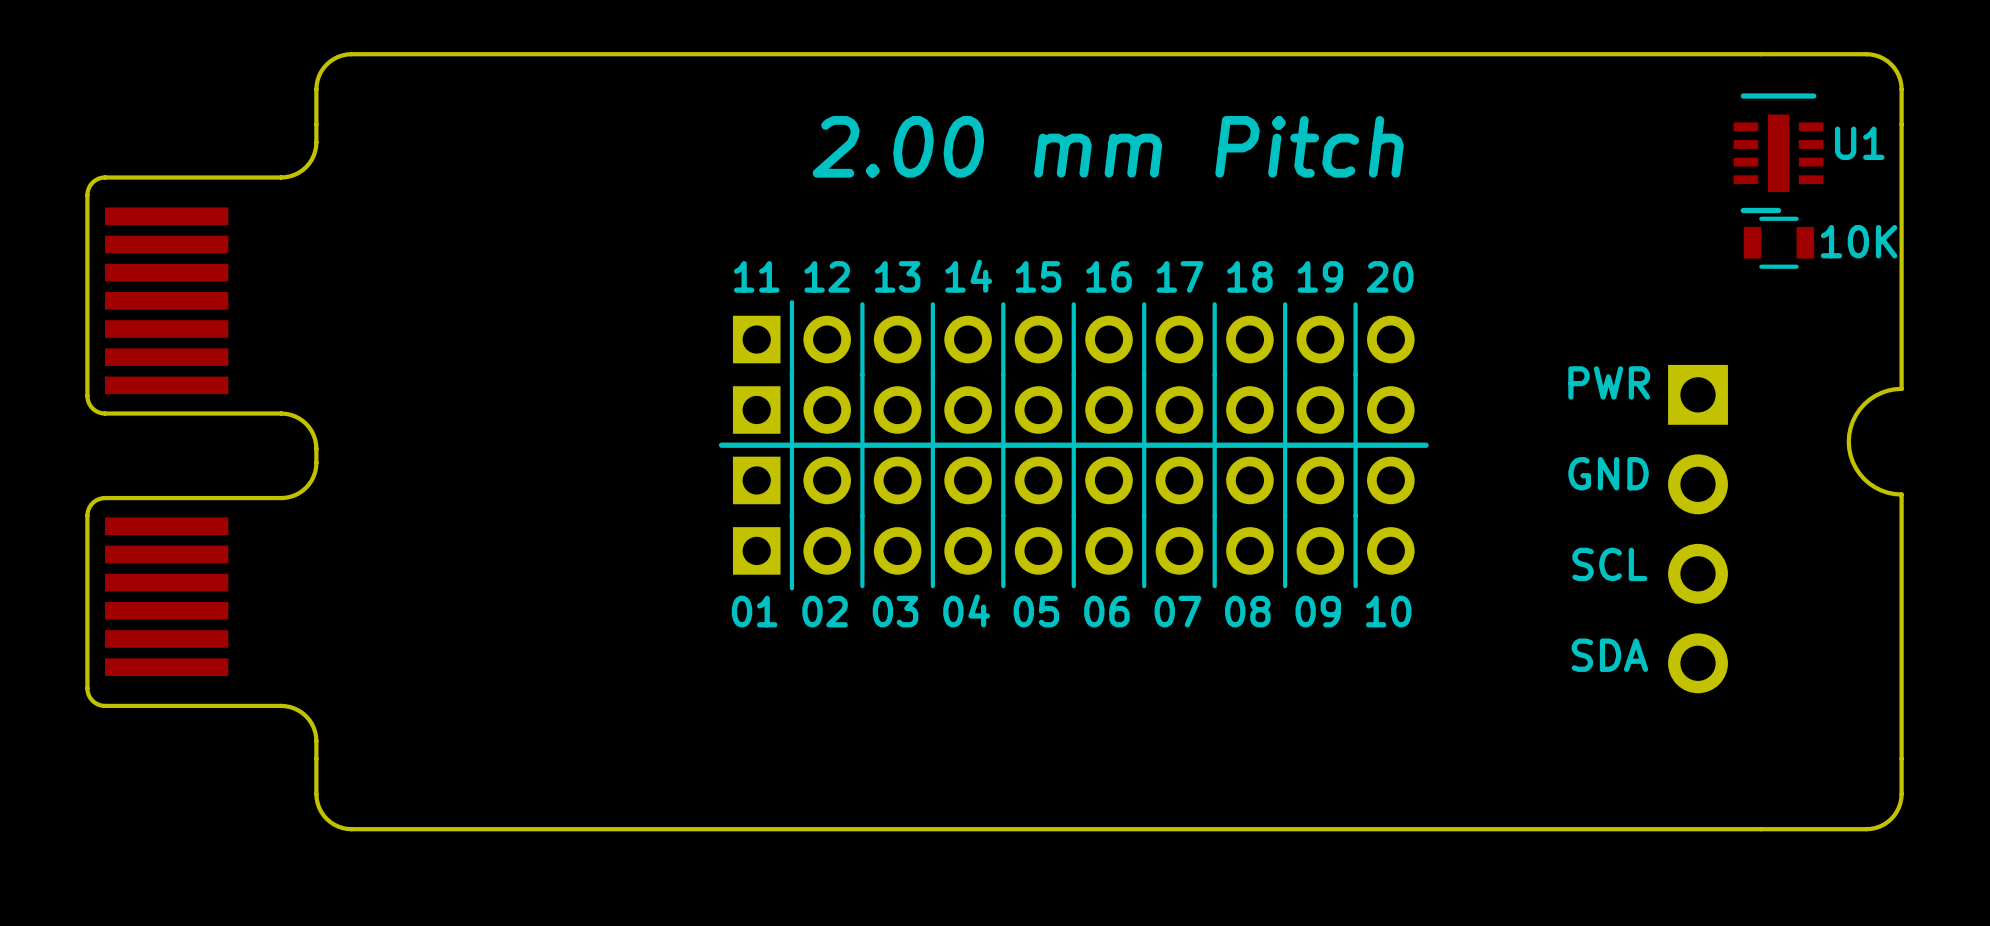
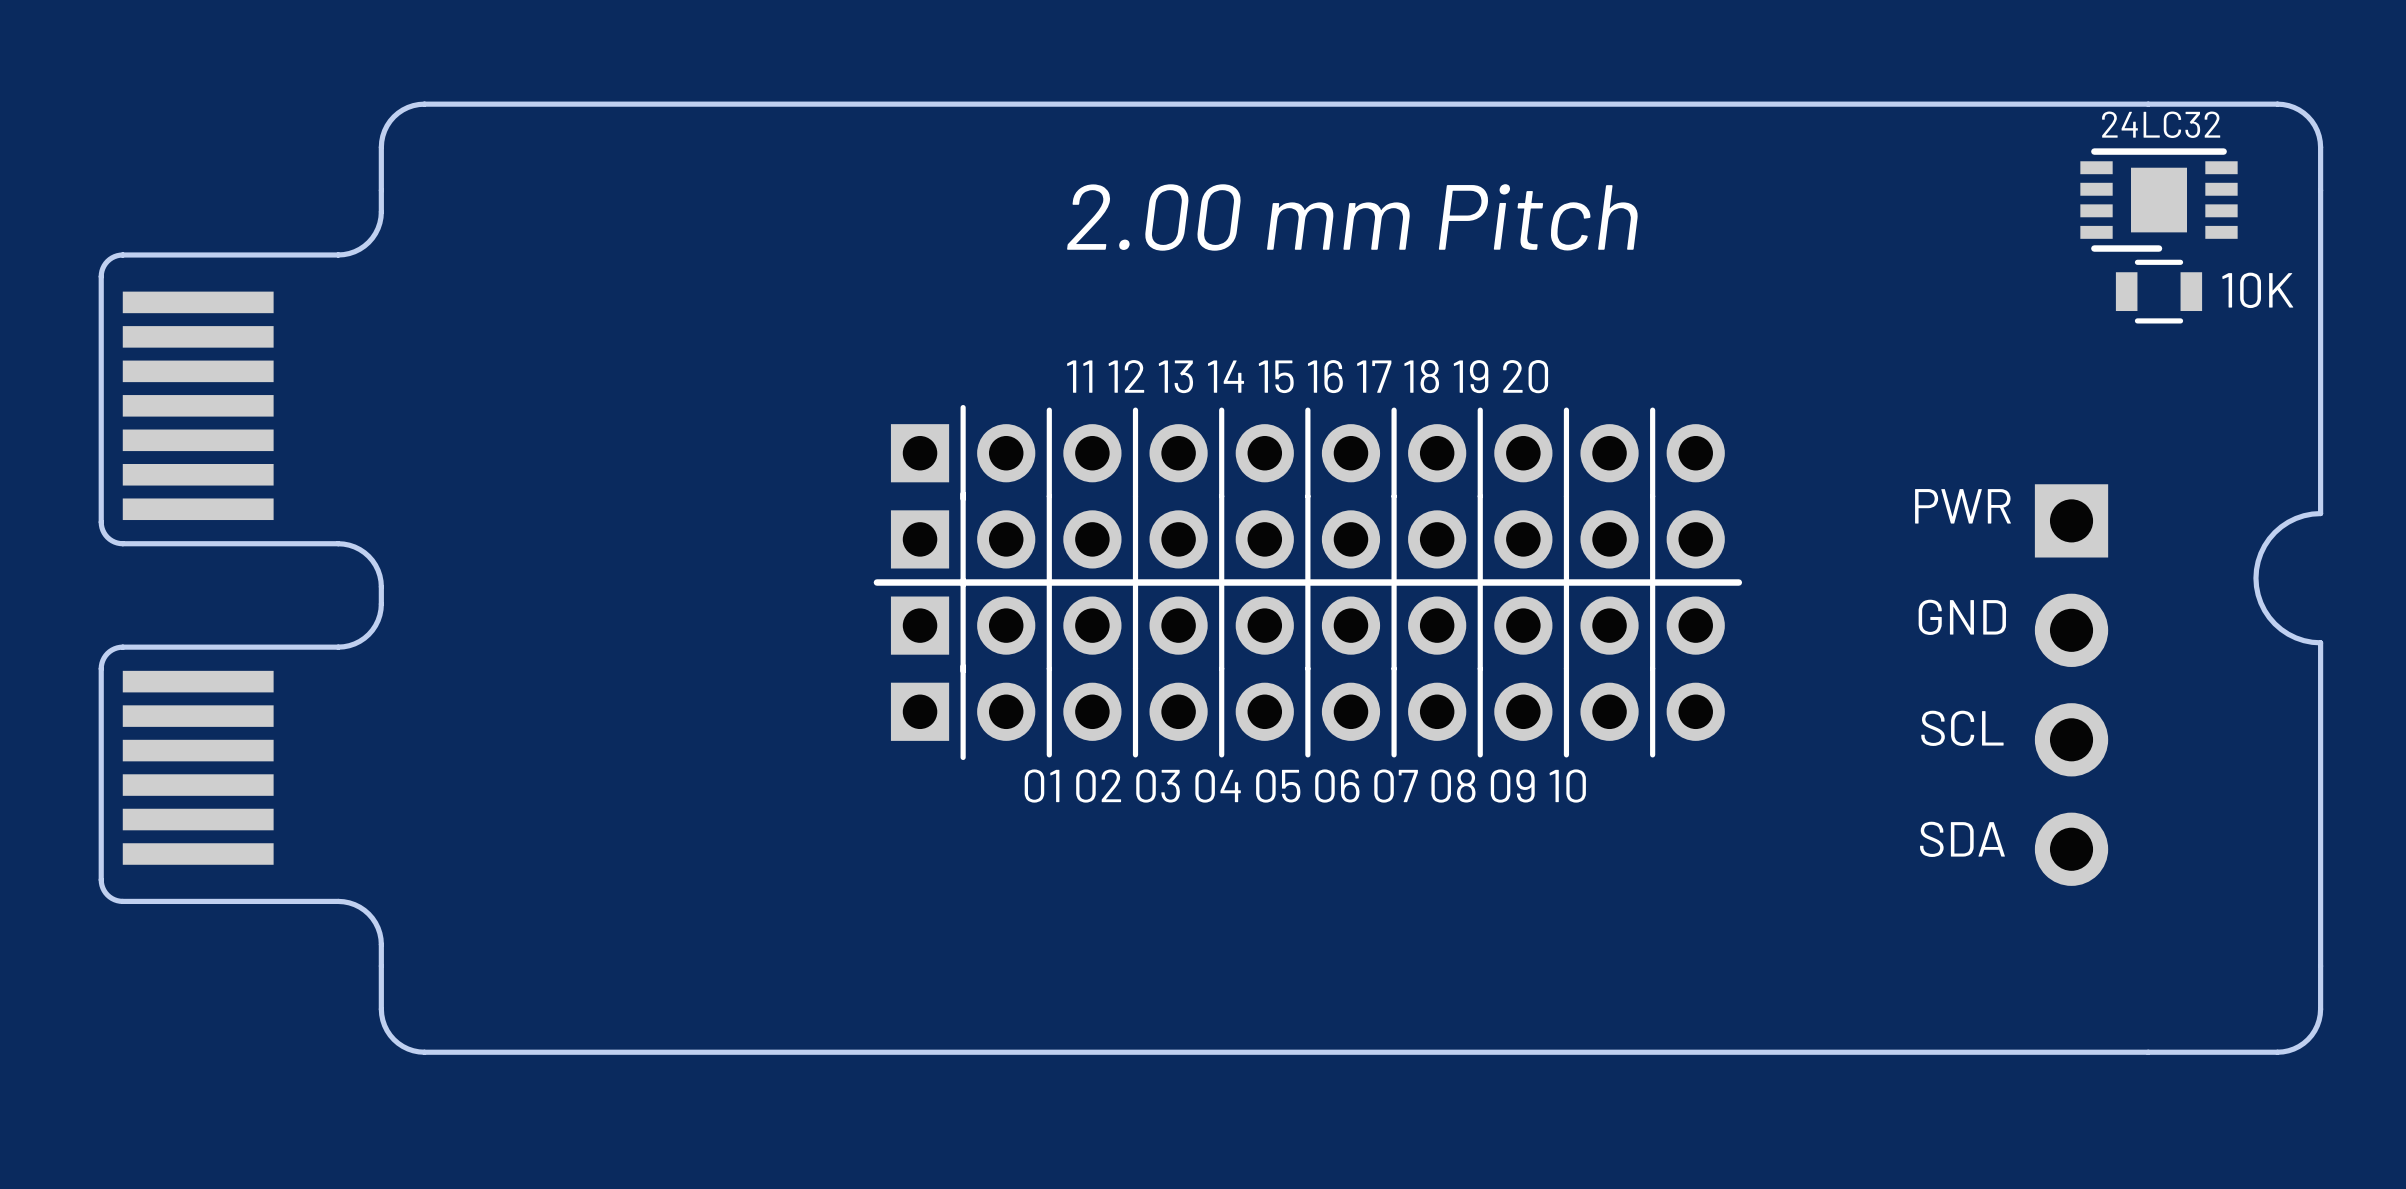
part: none -> 24LC32 (2159, 200)
U1: (1778, 153) -> none
part position: (1778, 242) -> (2159, 291)

